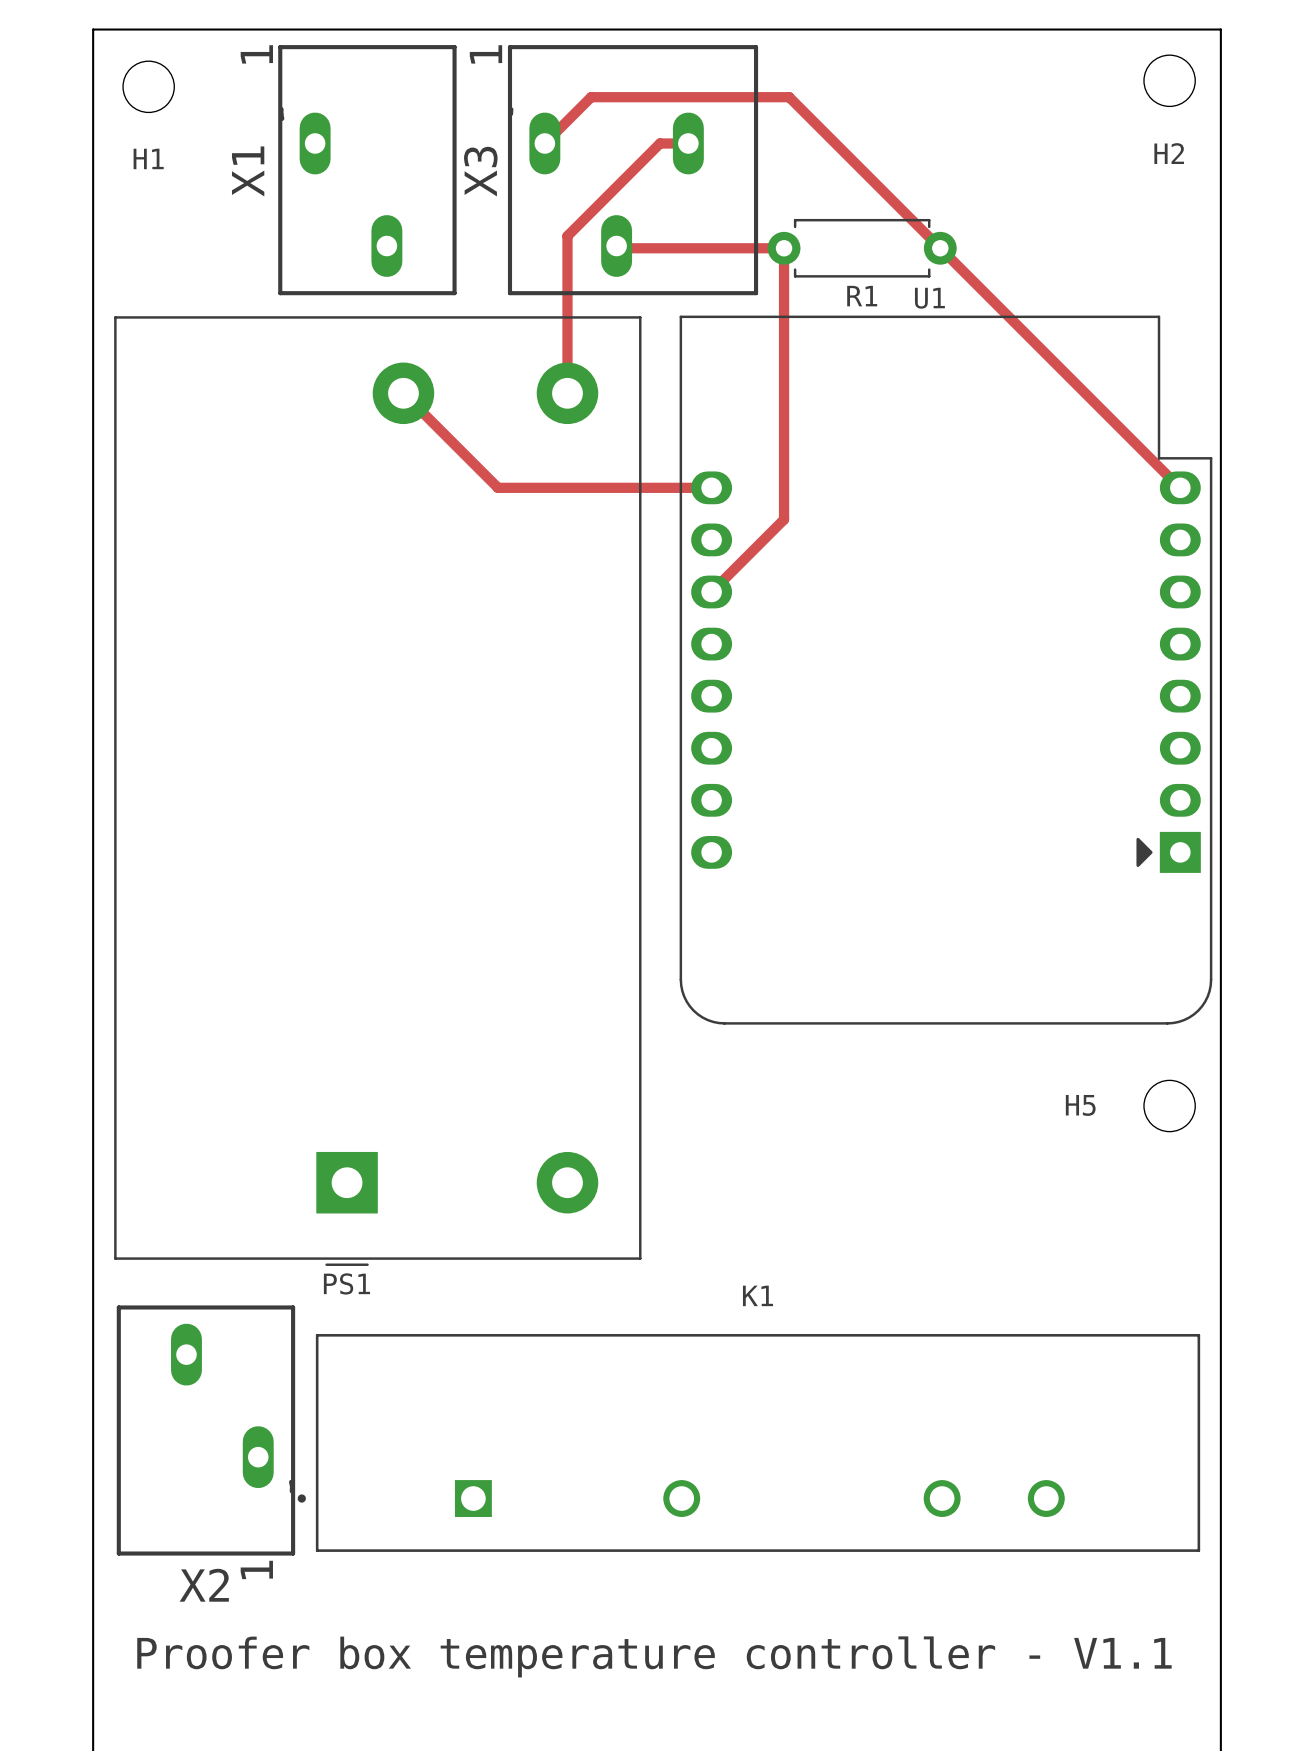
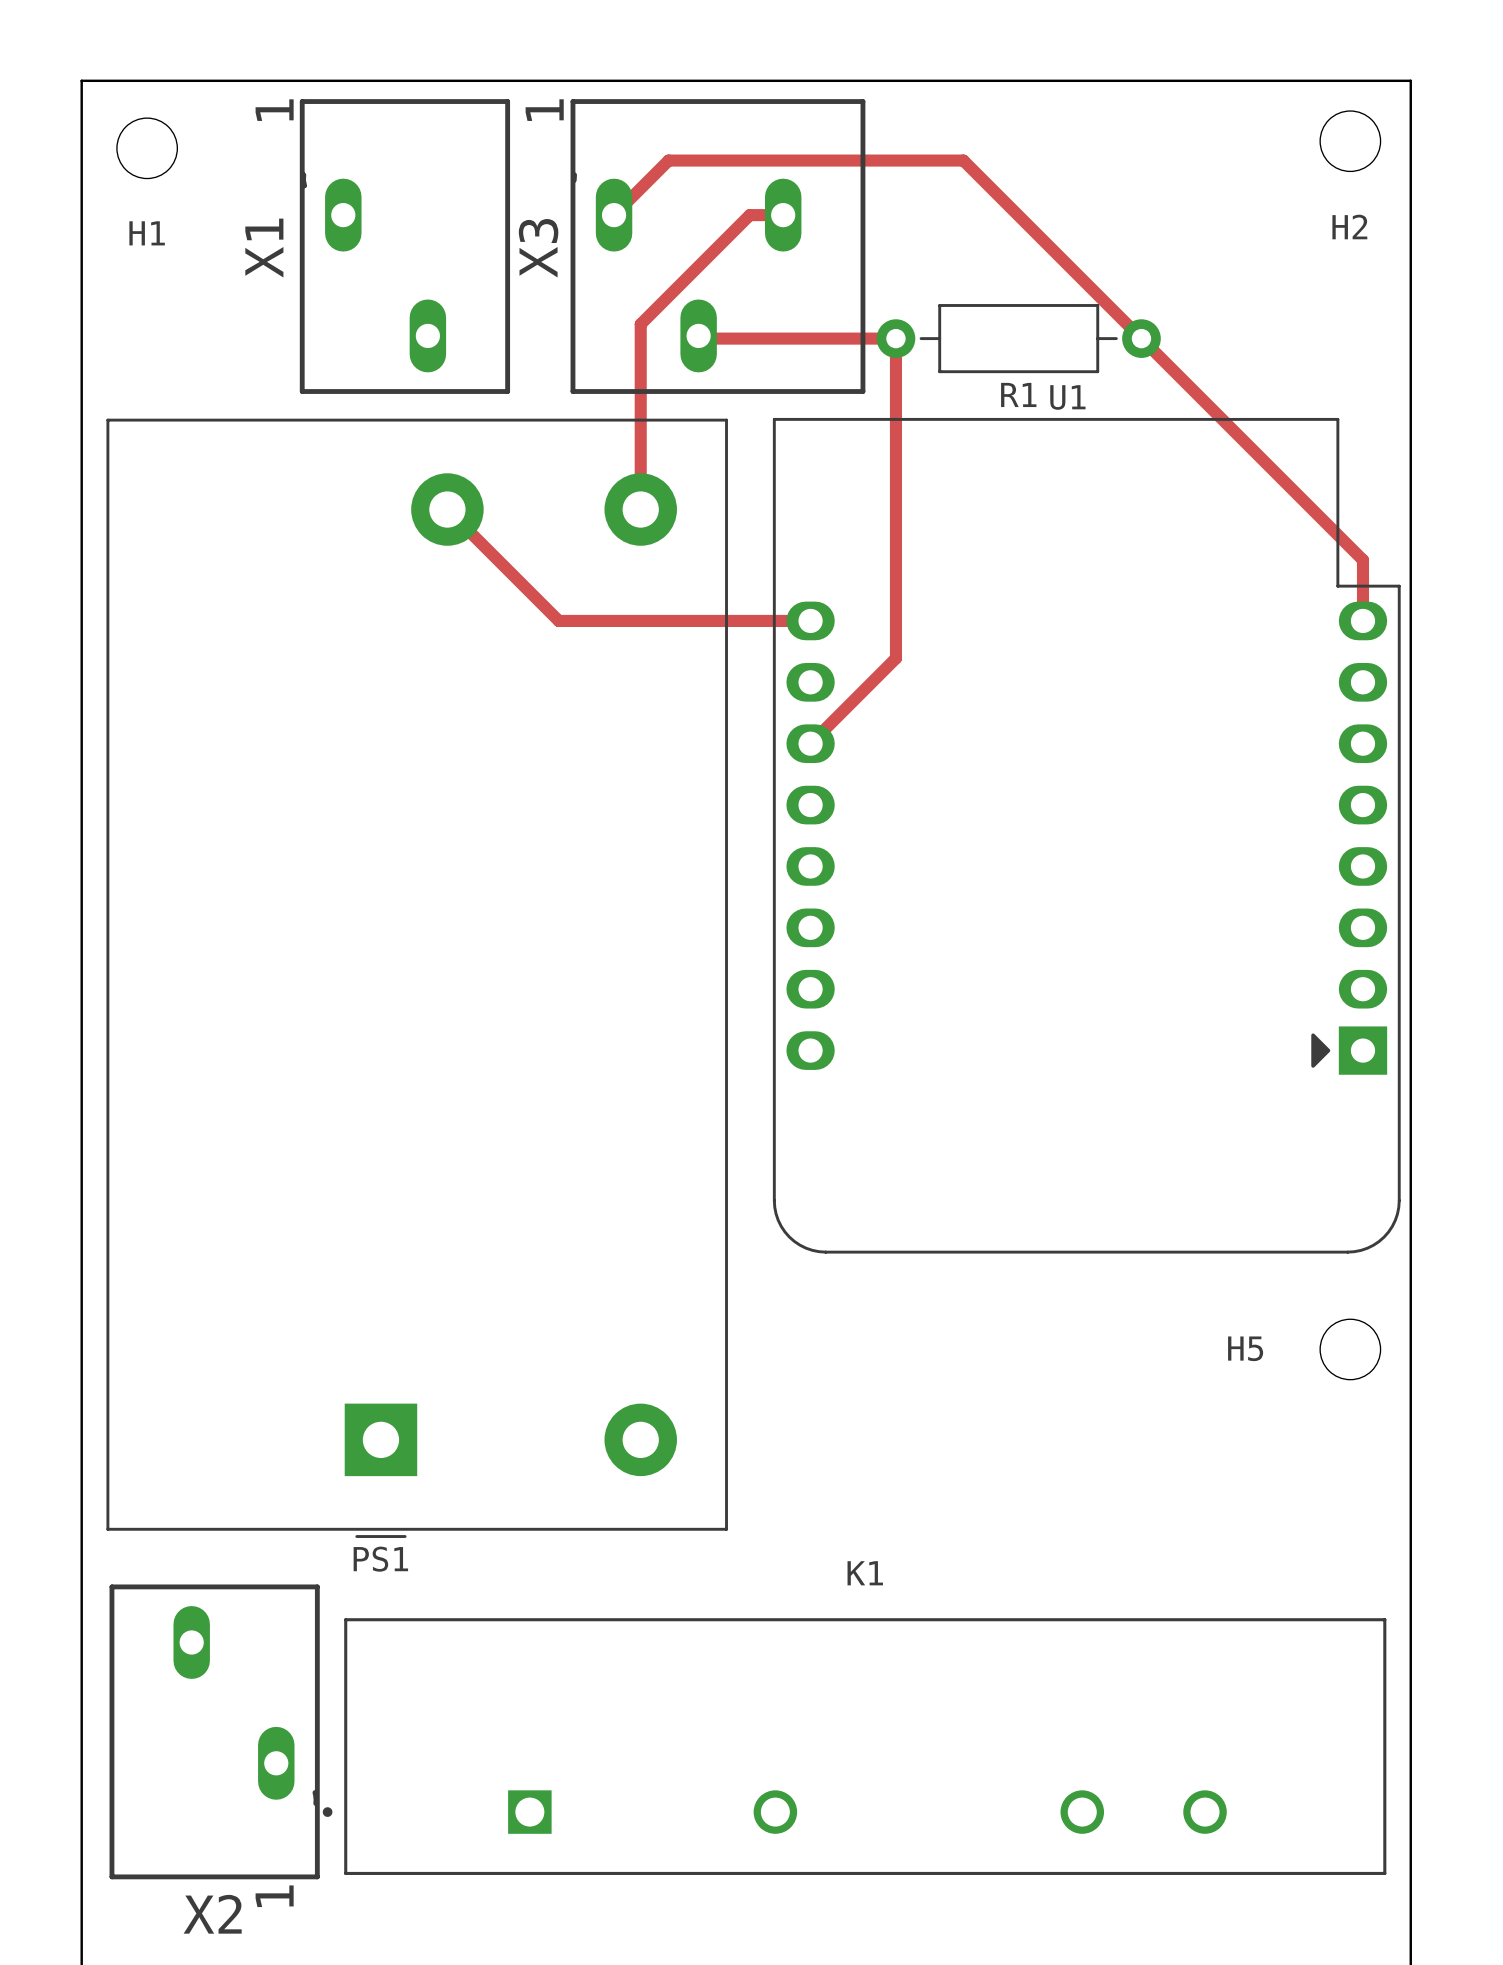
track: (789, 97) (1180, 487) -> (902, 160) (963, 160) (1362, 560) (1362, 620)
R1 footprint: [767, 218, 957, 278] -> [876, 304, 1161, 374]

